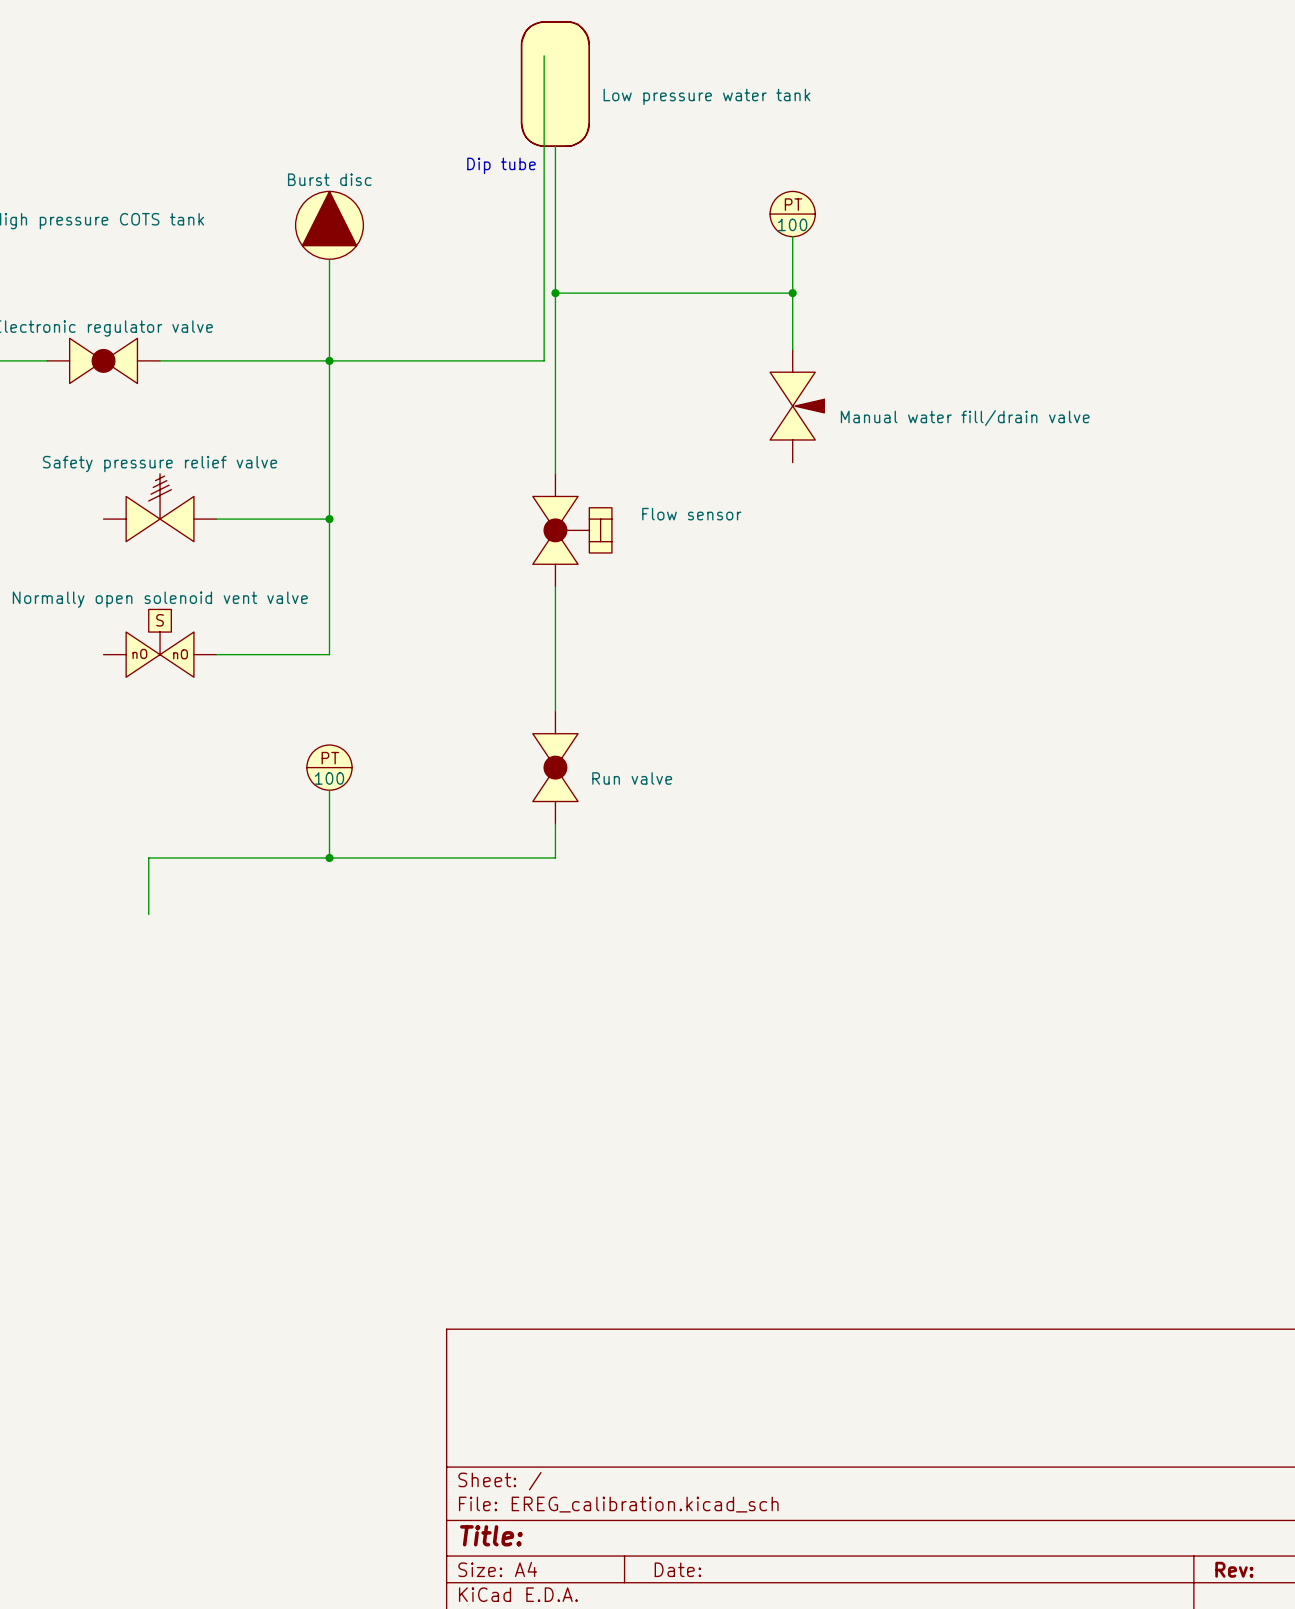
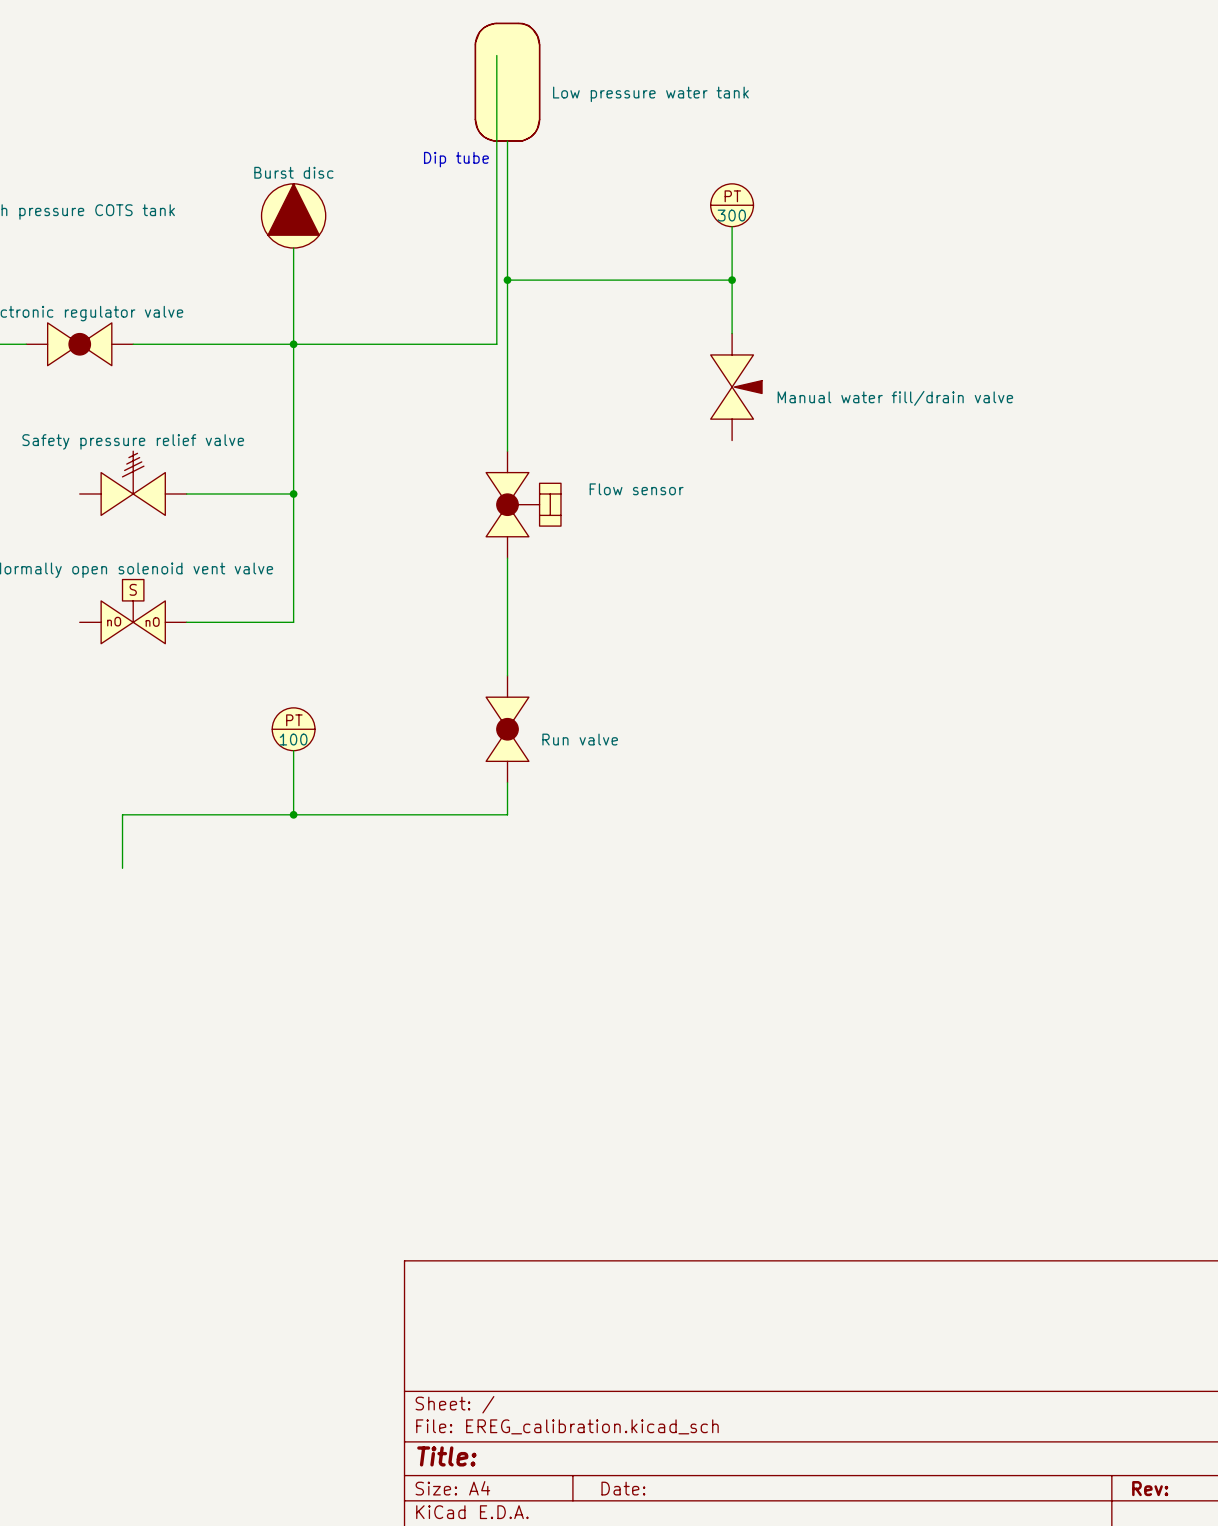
part value: 100 (792, 224) -> 300 (731, 215)

